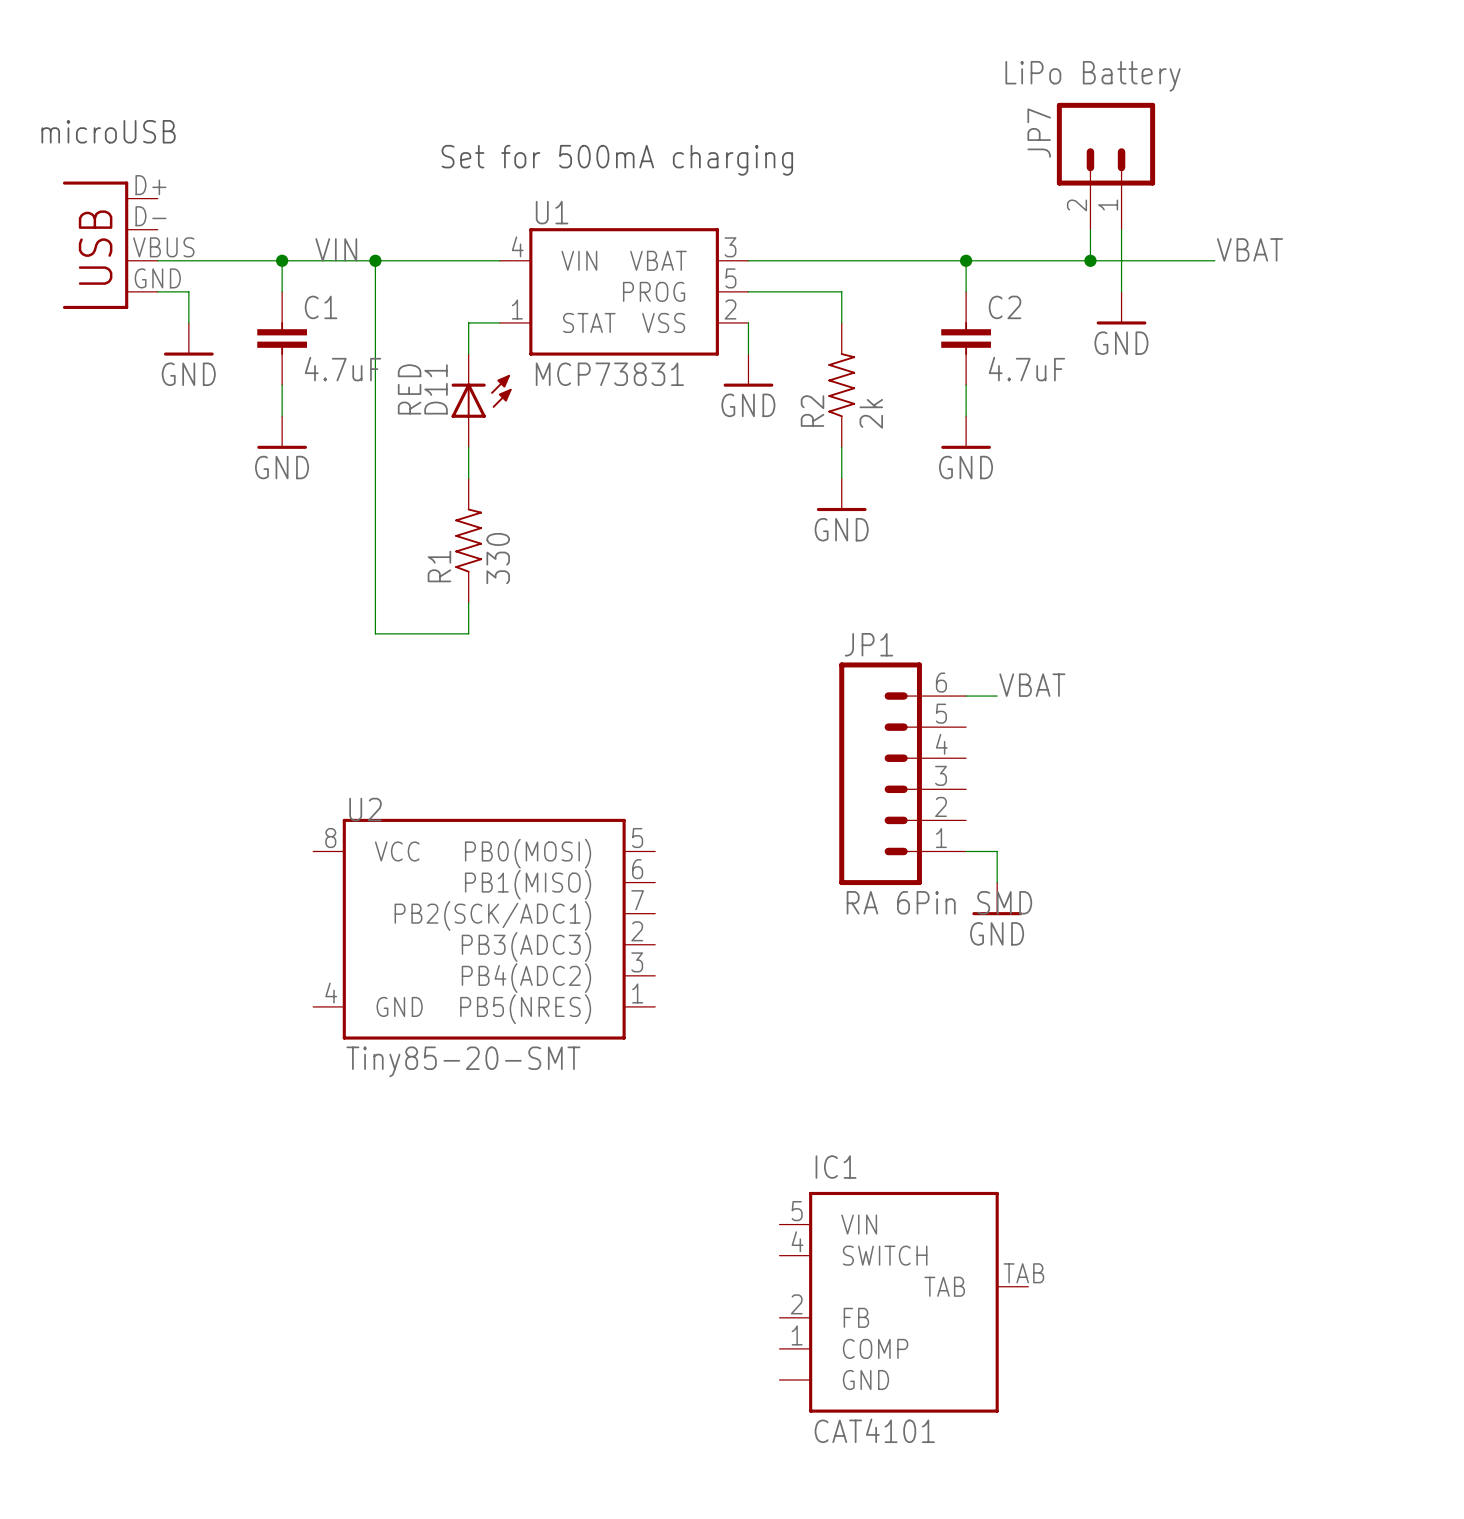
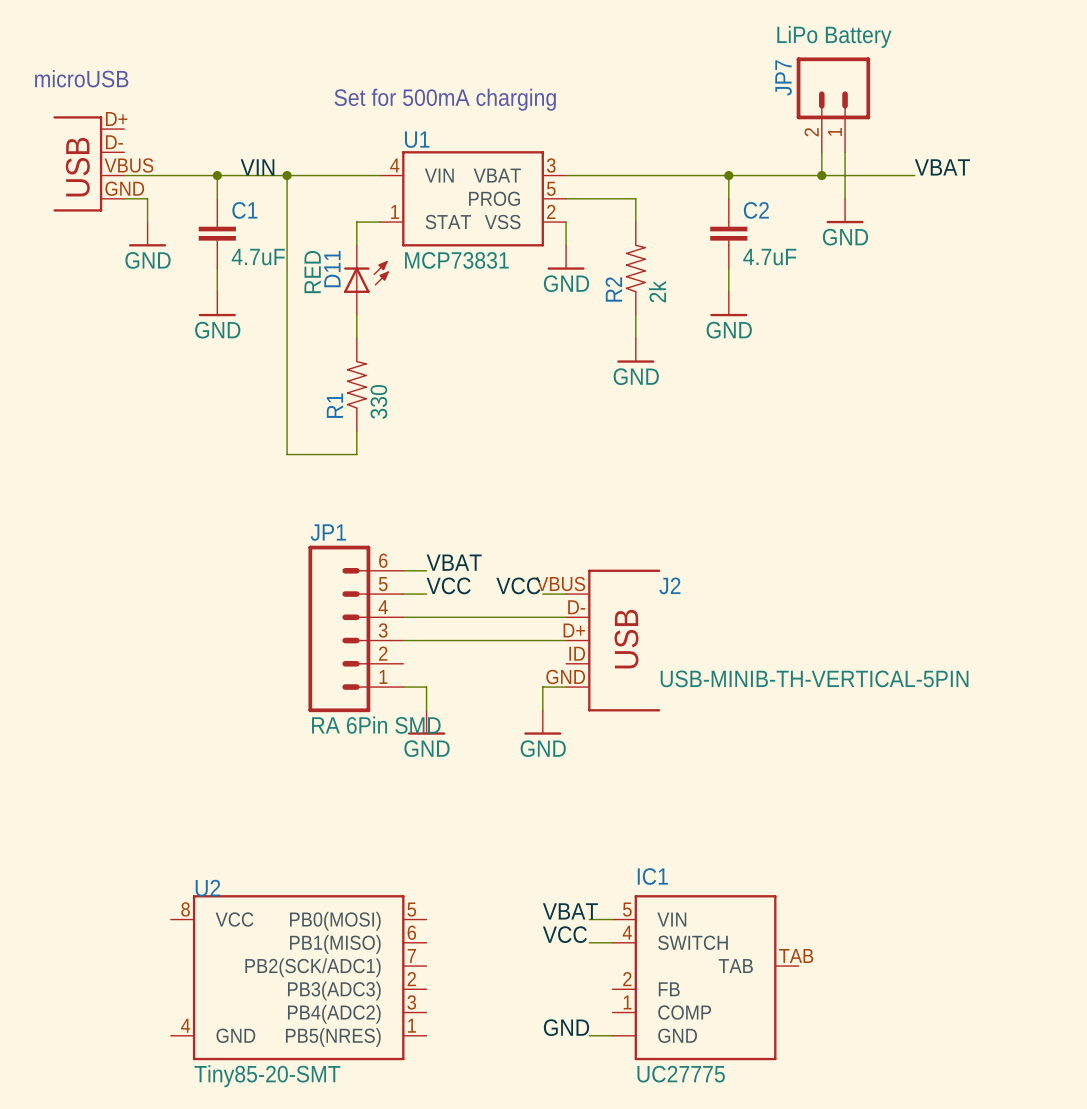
label: VBAT (1032, 685) -> none
wire: (966, 696) (997, 696) -> (542, 594) (566, 594)
JP1 position: (902, 773) -> (355, 628)
label: none -> VBAT (454, 562)
wire: none -> (403, 570) (426, 570)
label: none -> VCC (448, 585)
label: none -> VCC (518, 585)
wire: none -> (403, 617) (566, 617)
wire: (966, 851) (997, 851) (997, 882) -> none
wire: none -> (403, 640) (566, 640)
J2: none -> USB-MINIB-TH-VERTICAL-5PIN (613, 640)
power symbol: GND (997, 898) -> none
U2 position: (484, 929) -> (298, 977)
wire: none -> (403, 687) (426, 687) (426, 710)
wire: none -> (566, 687) (542, 687) (542, 710)
power symbol: none -> GND (426, 722)
power symbol: none -> GND (542, 722)
label: none -> VBAT (570, 911)
label: none -> VCC (564, 934)
wire: none -> (589, 942) (612, 942)
IC1 position: (903, 1302) -> (705, 977)
label: none -> GND (566, 1027)
wire: none -> (589, 1035) (612, 1035)
IC1 value: CAT4101 (874, 1430) -> UC27775 (681, 1074)

